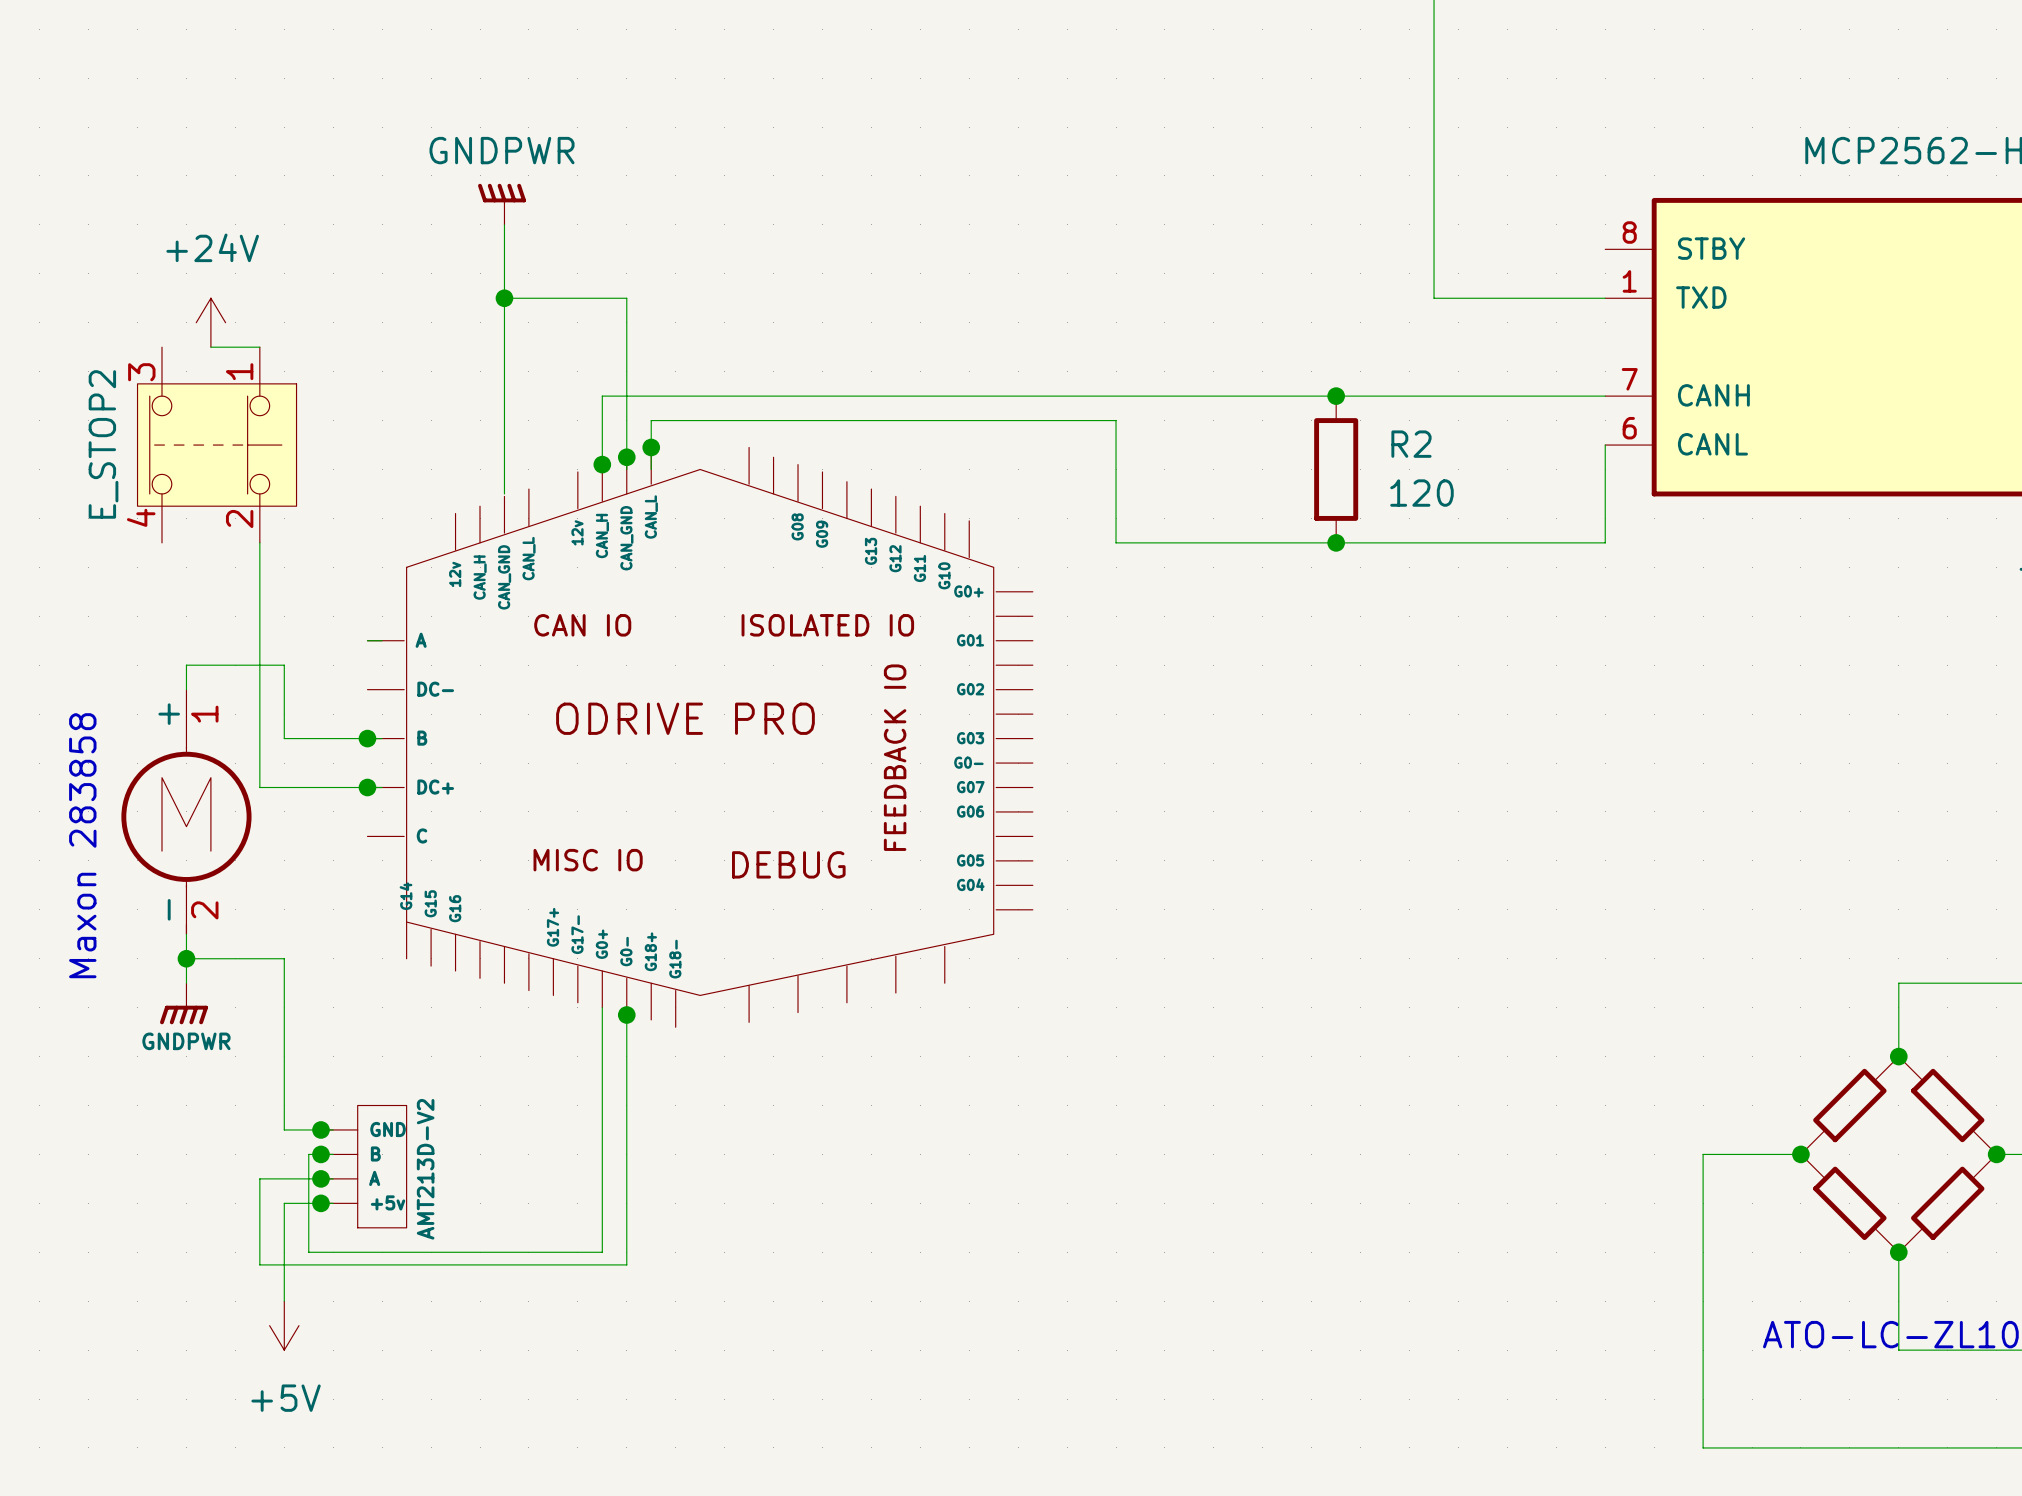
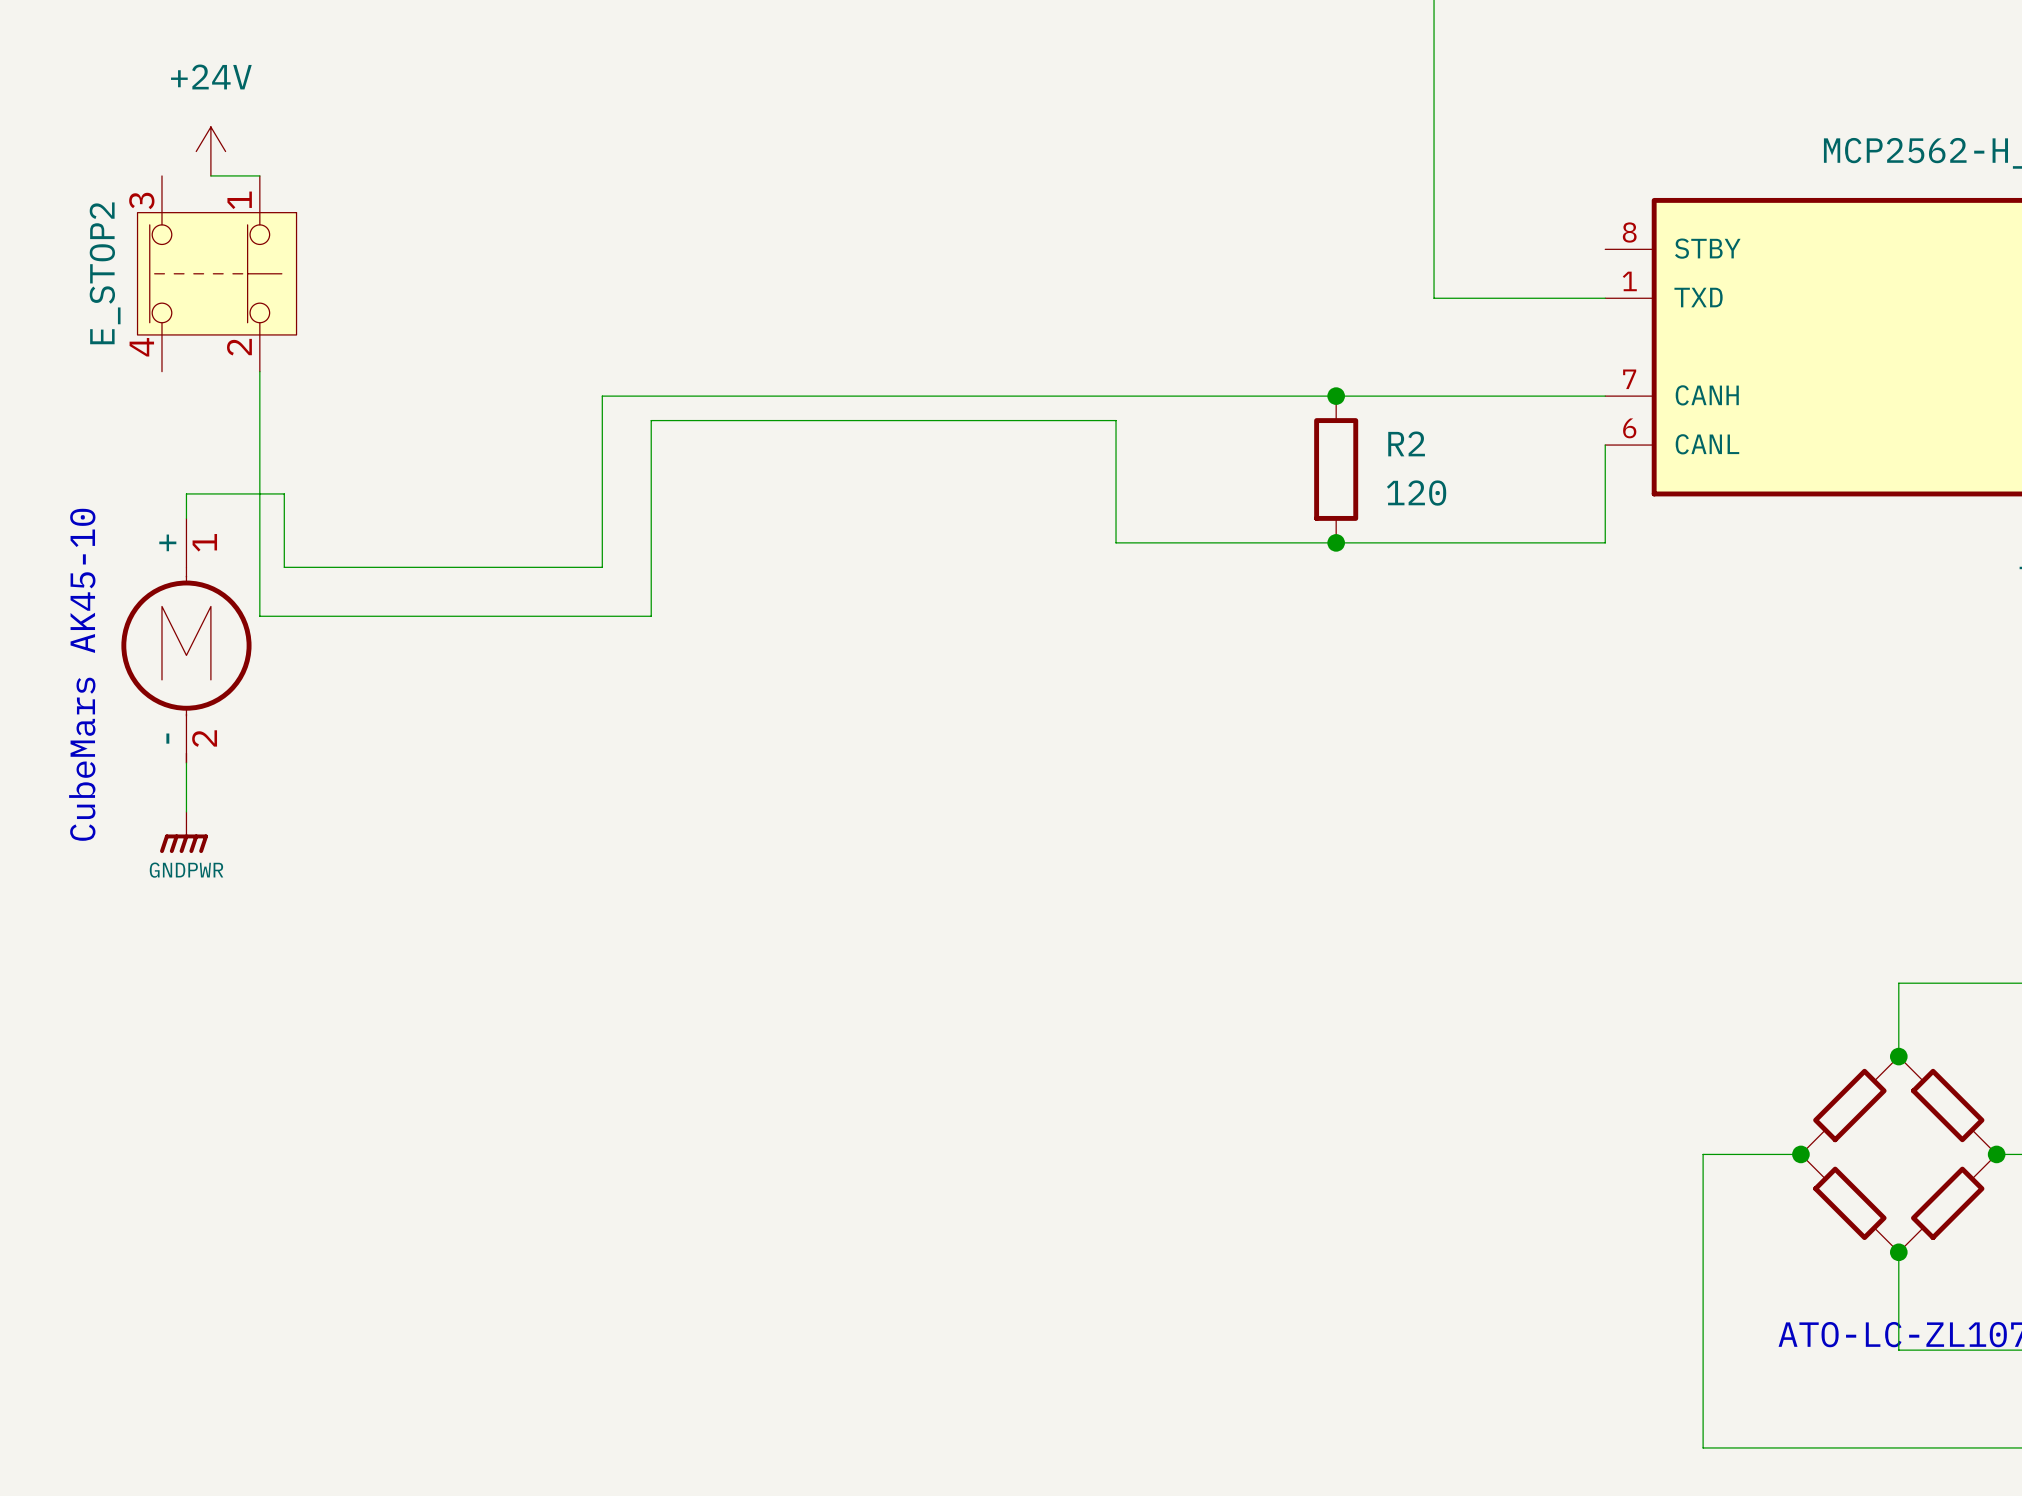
power symbol: GNDPWR (502, 204) -> none
wire: (504, 224) (504, 493) -> none
wire: (504, 298) (626, 298) (626, 469) -> none
junction: (504, 298) -> none
power symbol position: +24V (210, 322) -> +24V (210, 151)
wire: (210, 347) (259, 347) -> (210, 175) (259, 175)
E_STOP2 position: (217, 445) -> (217, 273)
junction: (651, 447) -> none
junction: (626, 457) -> none
junction: (602, 464) -> none
wire: none -> (602, 469) (602, 567) (284, 567) (284, 493) (186, 493) (186, 518)
wire: (259, 616) (259, 787) (382, 787) -> (259, 616) (651, 616) (651, 469)
wire: (367, 640) (382, 640) -> none
text: none -> CubeMars AK45-10 (82, 674)
wire: (186, 689) (186, 665) (284, 665) (284, 738) (382, 738) -> none
part: (700, 737) -> none
junction: (367, 738) -> none
junction: (367, 787) -> none
part position: (186, 811) -> (186, 640)
text: Maxon 283858 (82, 845) -> none
wire: (186, 934) (186, 983) -> (186, 763) (186, 811)
wire: (186, 958) (284, 958) (284, 1129) (333, 1129) -> none
junction: (186, 958) -> none
power symbol position: GNDPWR (184, 1003) -> GNDPWR (184, 832)
wire: (602, 1007) (602, 1252) (308, 1252) (308, 1154) (333, 1154) -> none
wire: (626, 1007) (626, 1264) (259, 1264) (259, 1178) (333, 1178) -> none
junction: (626, 1015) -> none
junction: (320, 1129) -> none
junction: (320, 1154) -> none
AMT213D-V2: (363, 1166) -> none
junction: (320, 1178) -> none
junction: (320, 1203) -> none
wire: (333, 1203) (284, 1203) (284, 1301) -> none
power symbol: +5V (284, 1325) -> none

